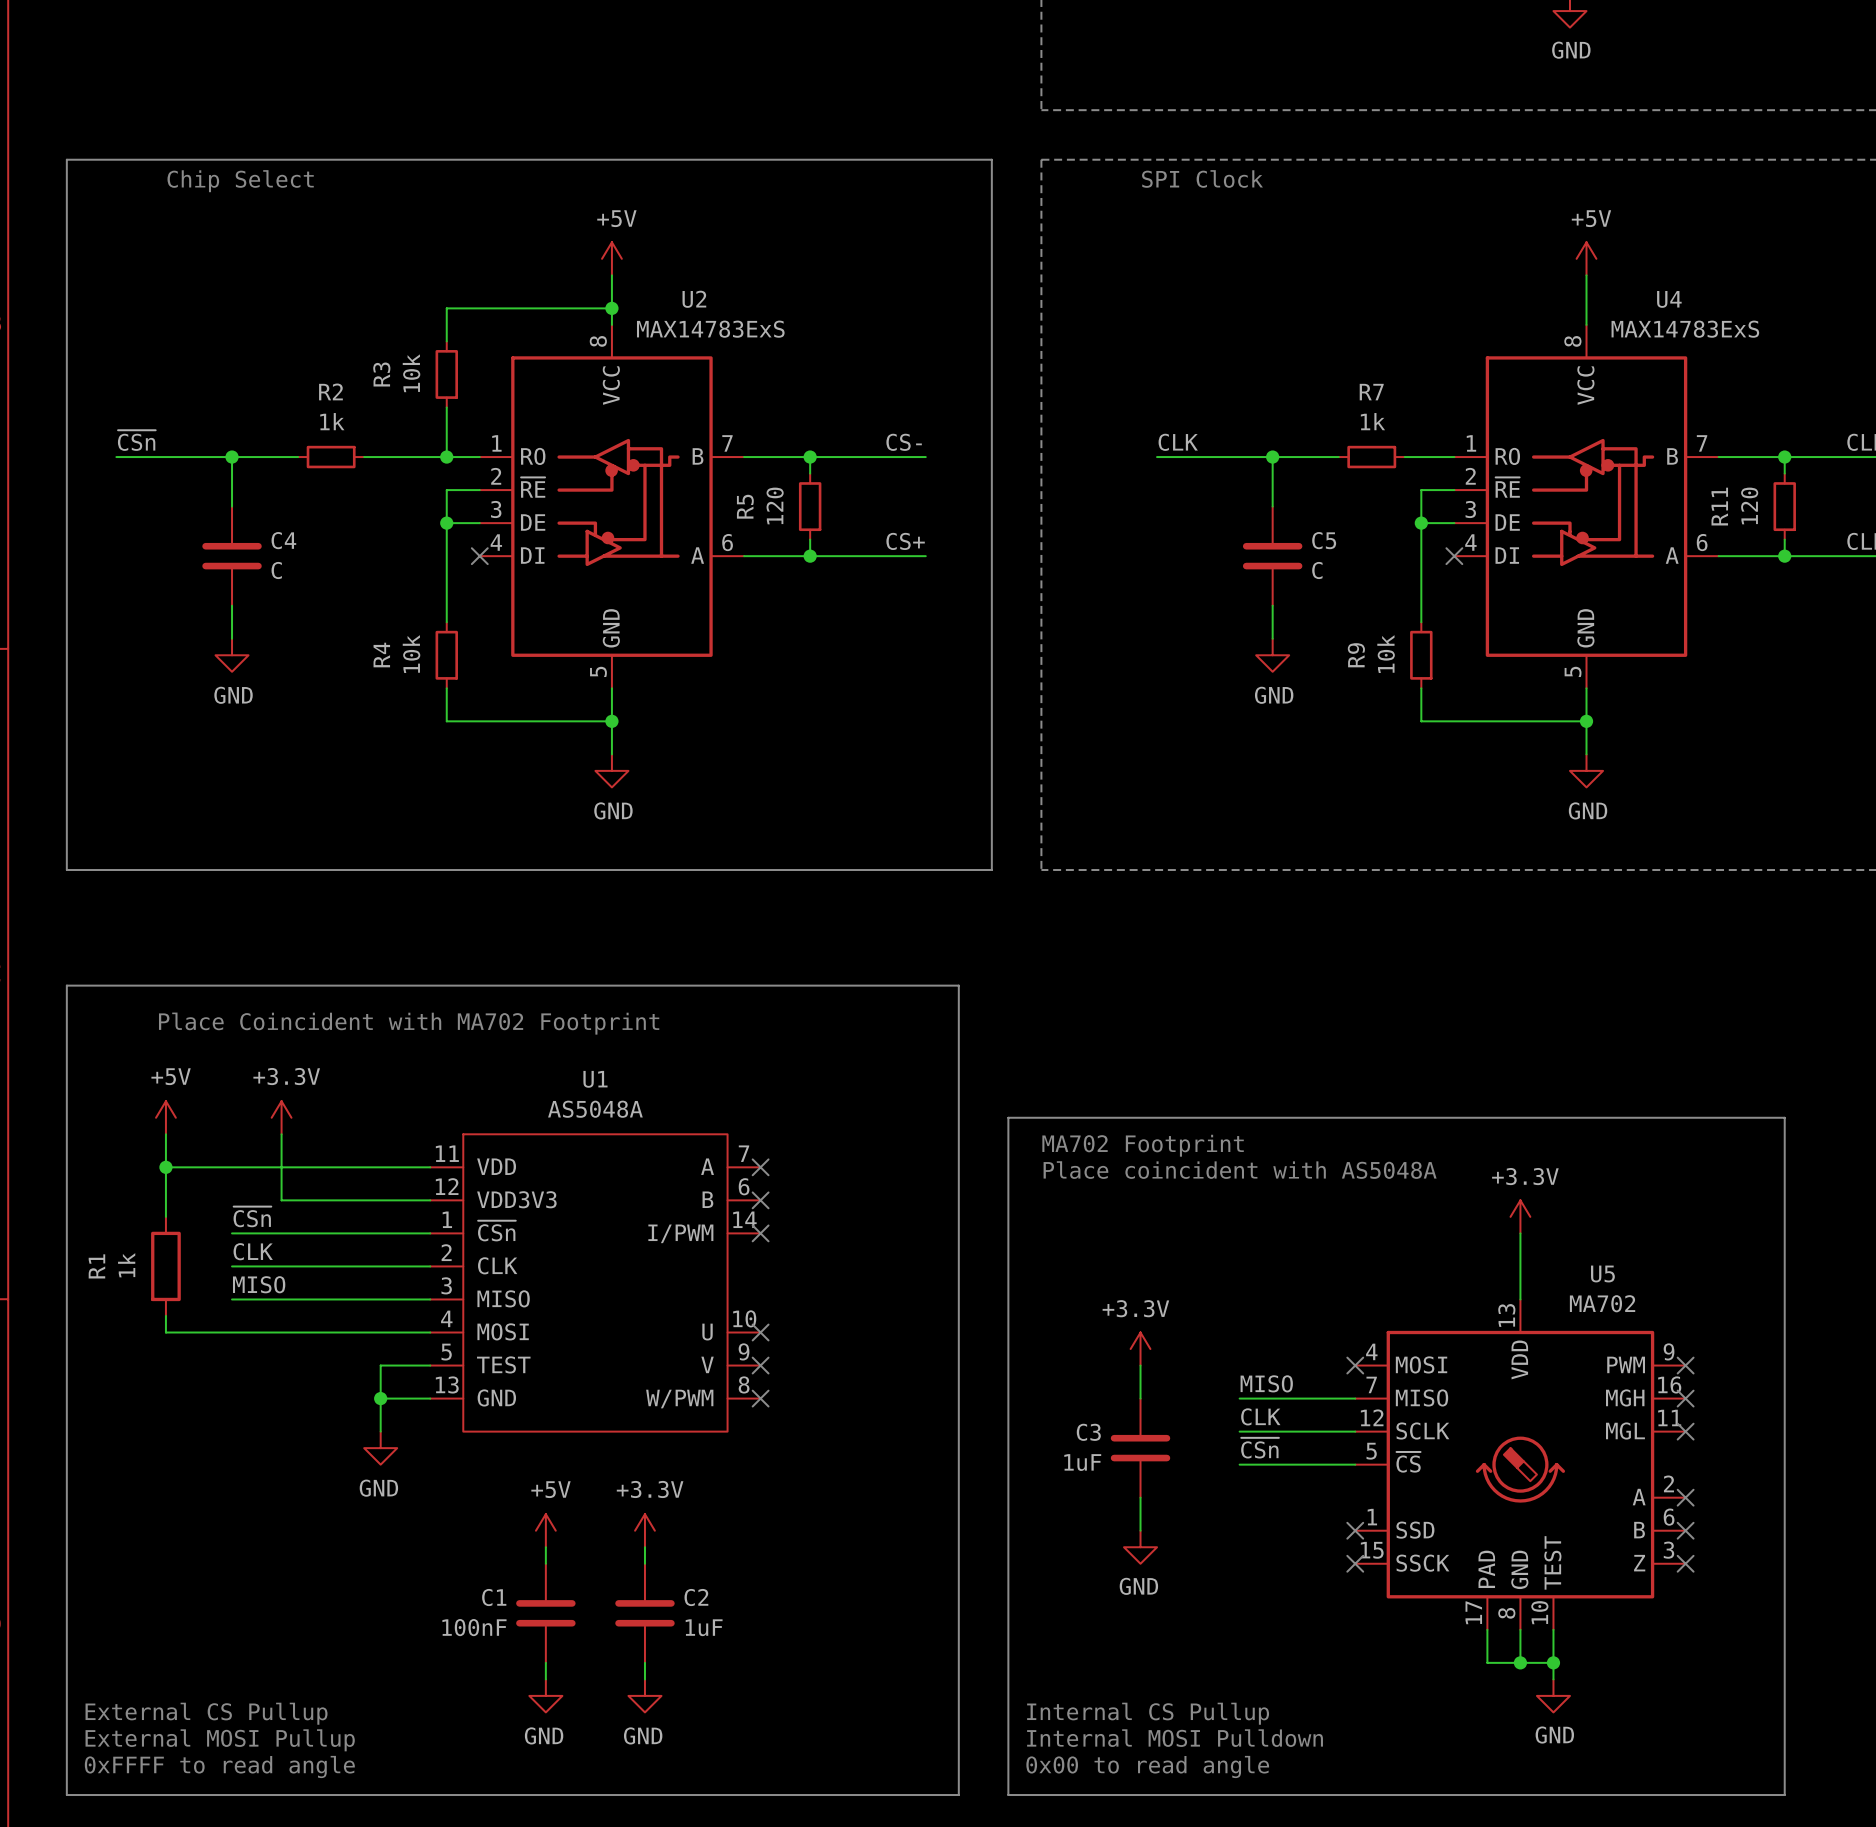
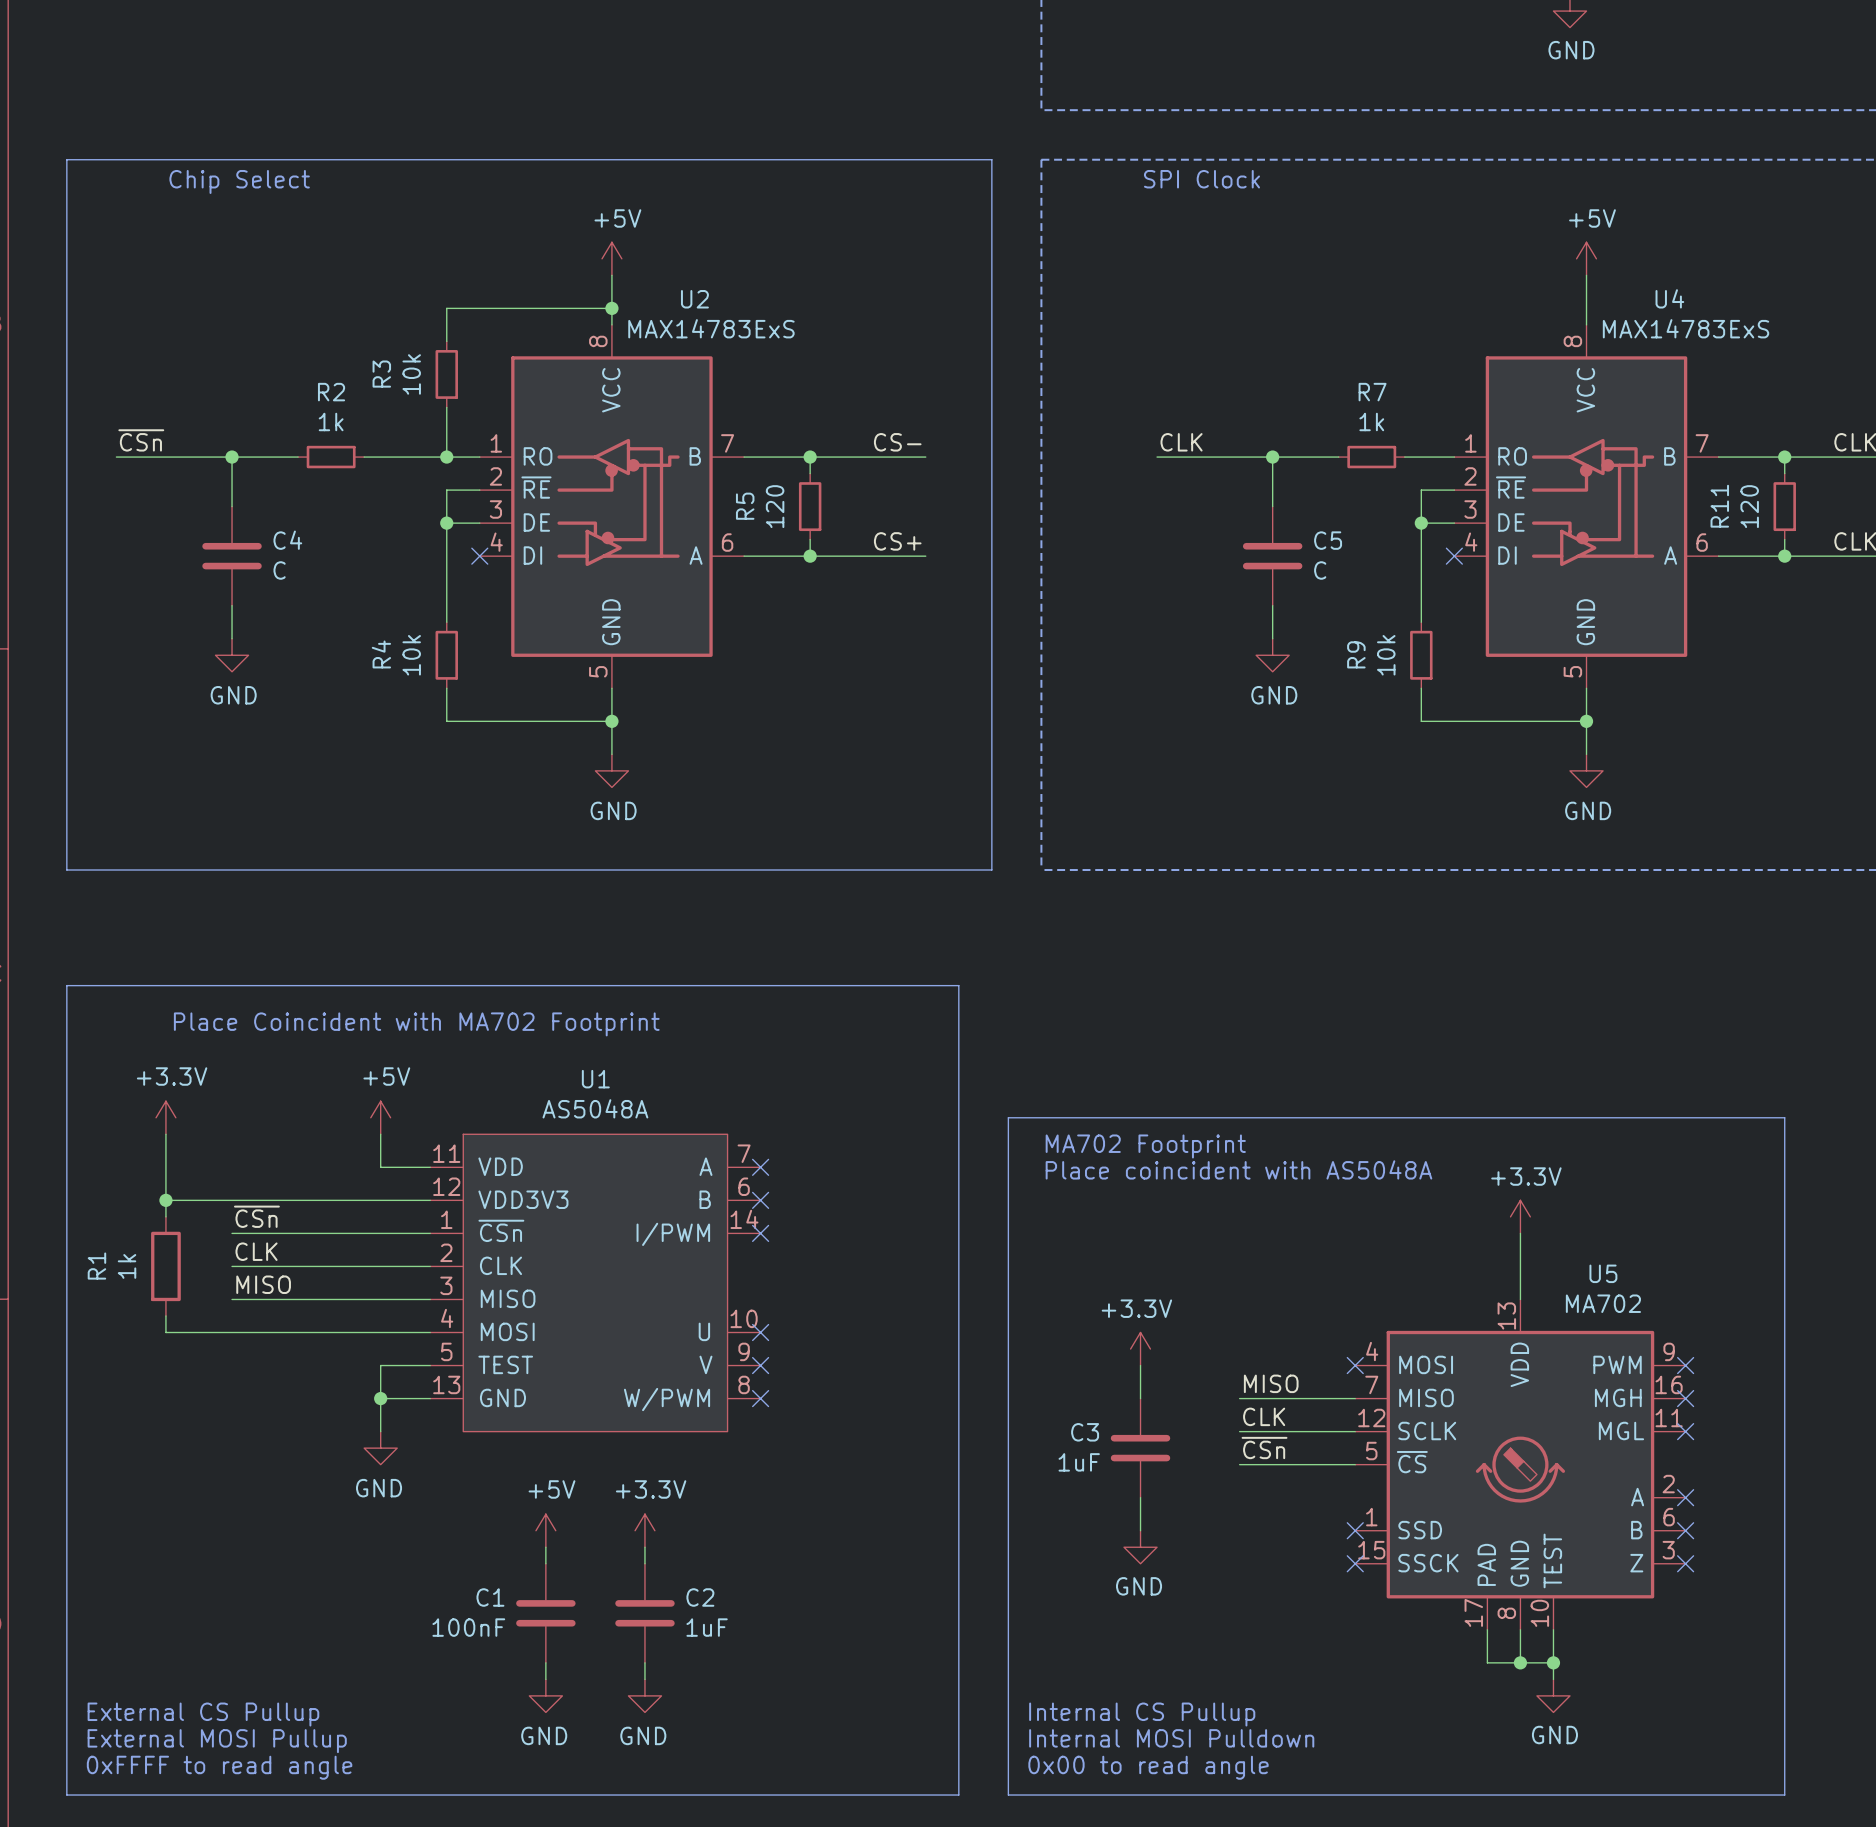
power symbol: +5V (165, 1117) -> +3.3V (165, 1117)
power symbol: +3.3V (281, 1117) -> none
power symbol: none -> +5V (380, 1117)
wire: (281, 1134) (281, 1200) -> (165, 1200) (281, 1200)
wire: (165, 1167) (380, 1167) -> (380, 1134) (380, 1167)
junction position: (165, 1167) -> (165, 1200)

